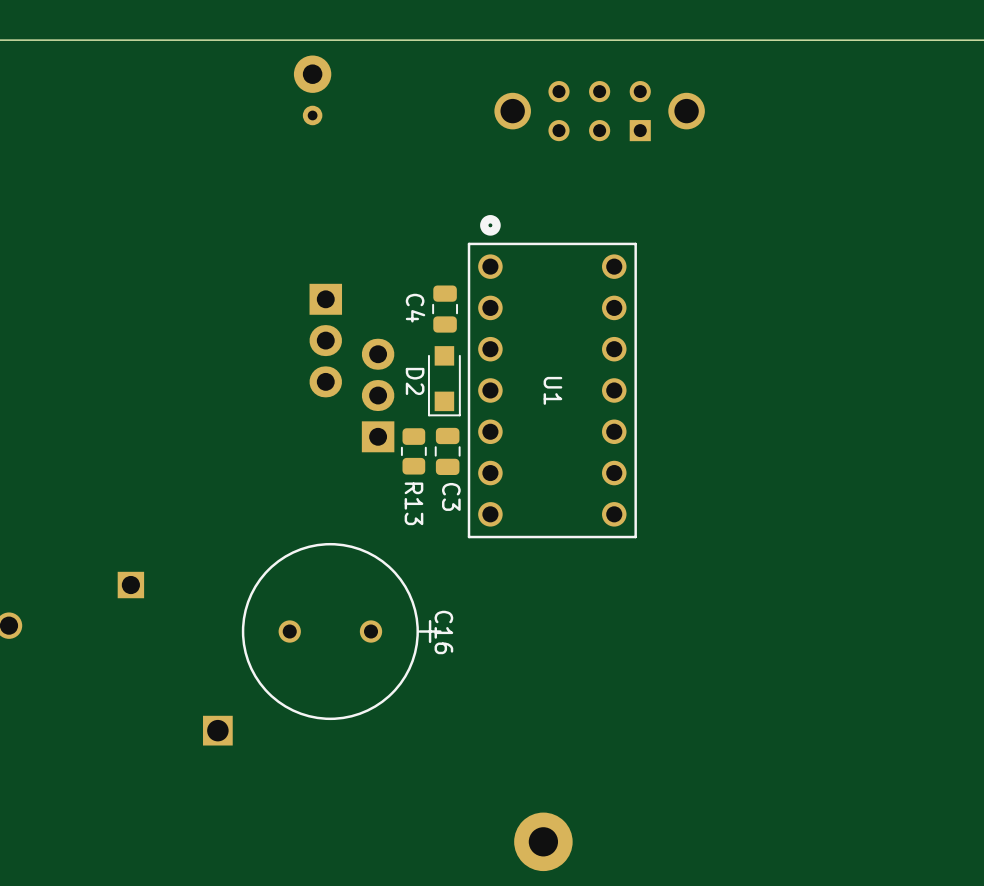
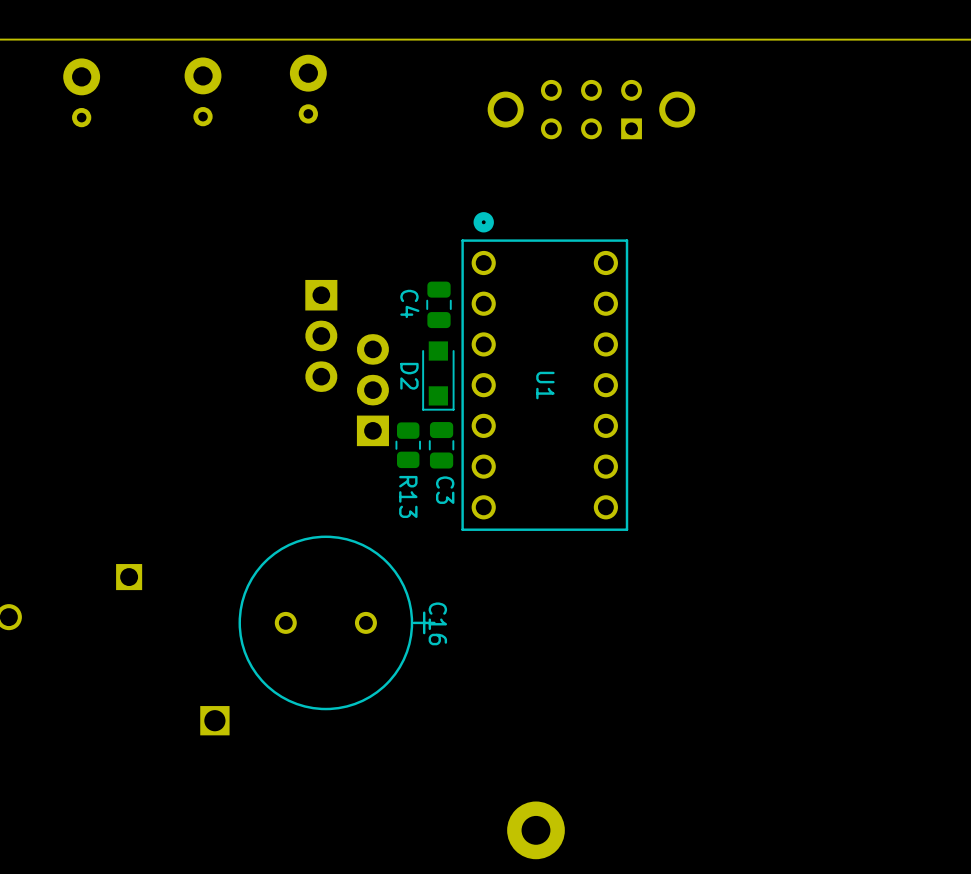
part: none -> (203, 91)
part: none -> (81, 92)

